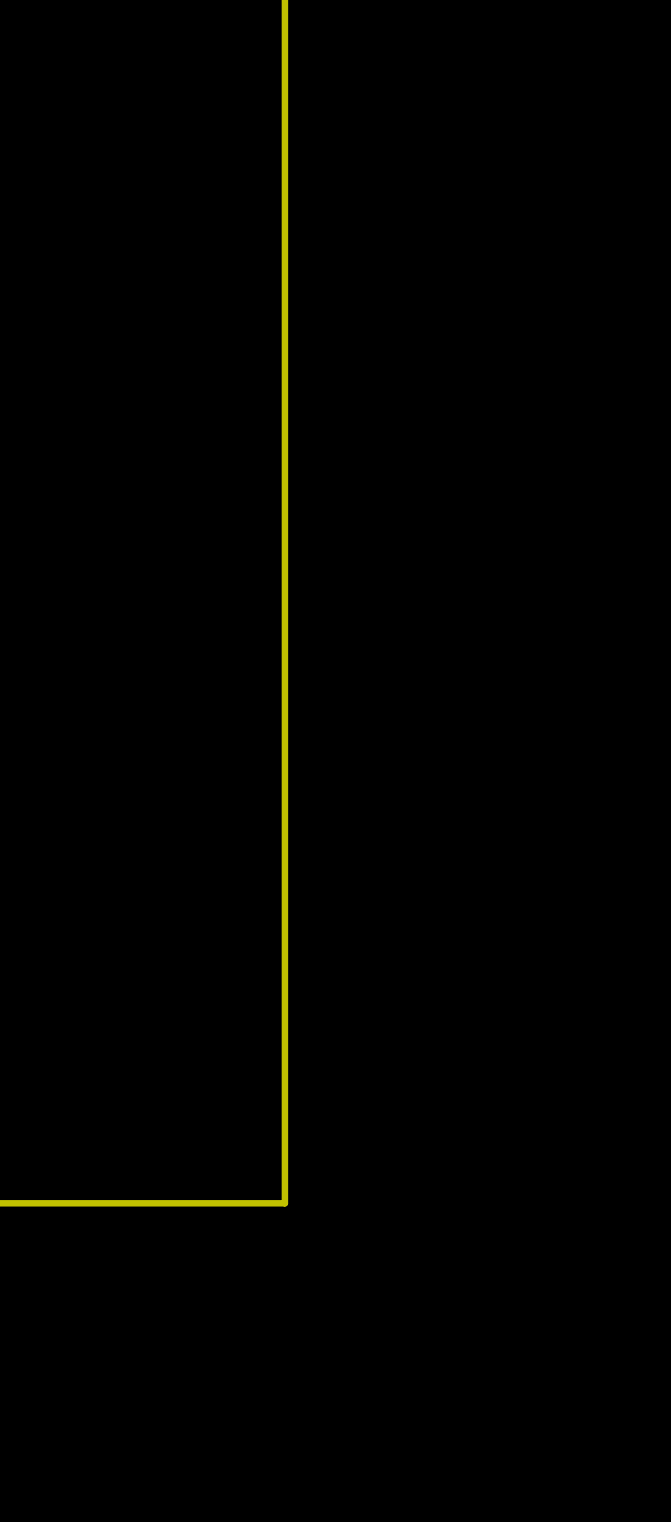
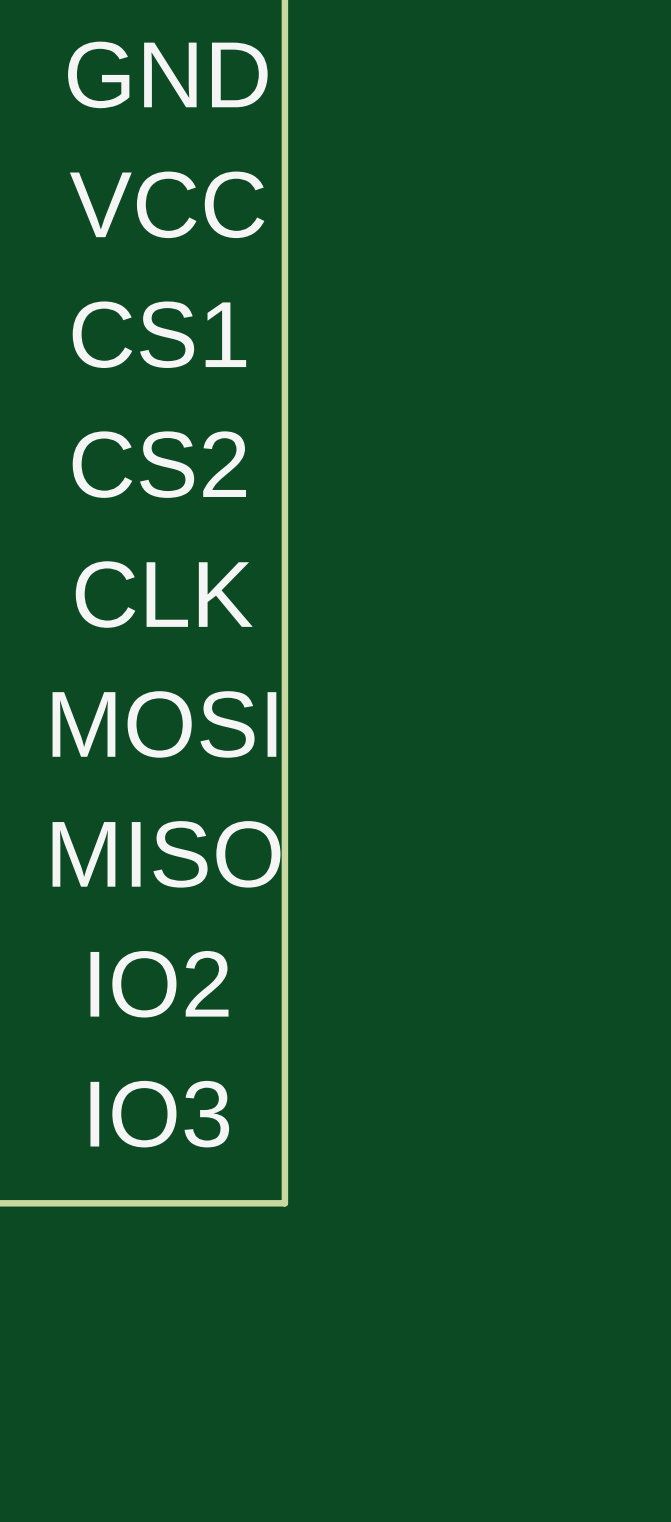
text: none -> GND (167, 74)
text: none -> VCC (167, 204)
text: none -> CS1 (159, 334)
text: none -> CS2 (159, 464)
text: none -> CLK (164, 594)
text: none -> MOSI (164, 724)
text: none -> MISO (166, 854)
text: none -> IO2 (159, 984)
text: none -> IO3 (159, 1114)

